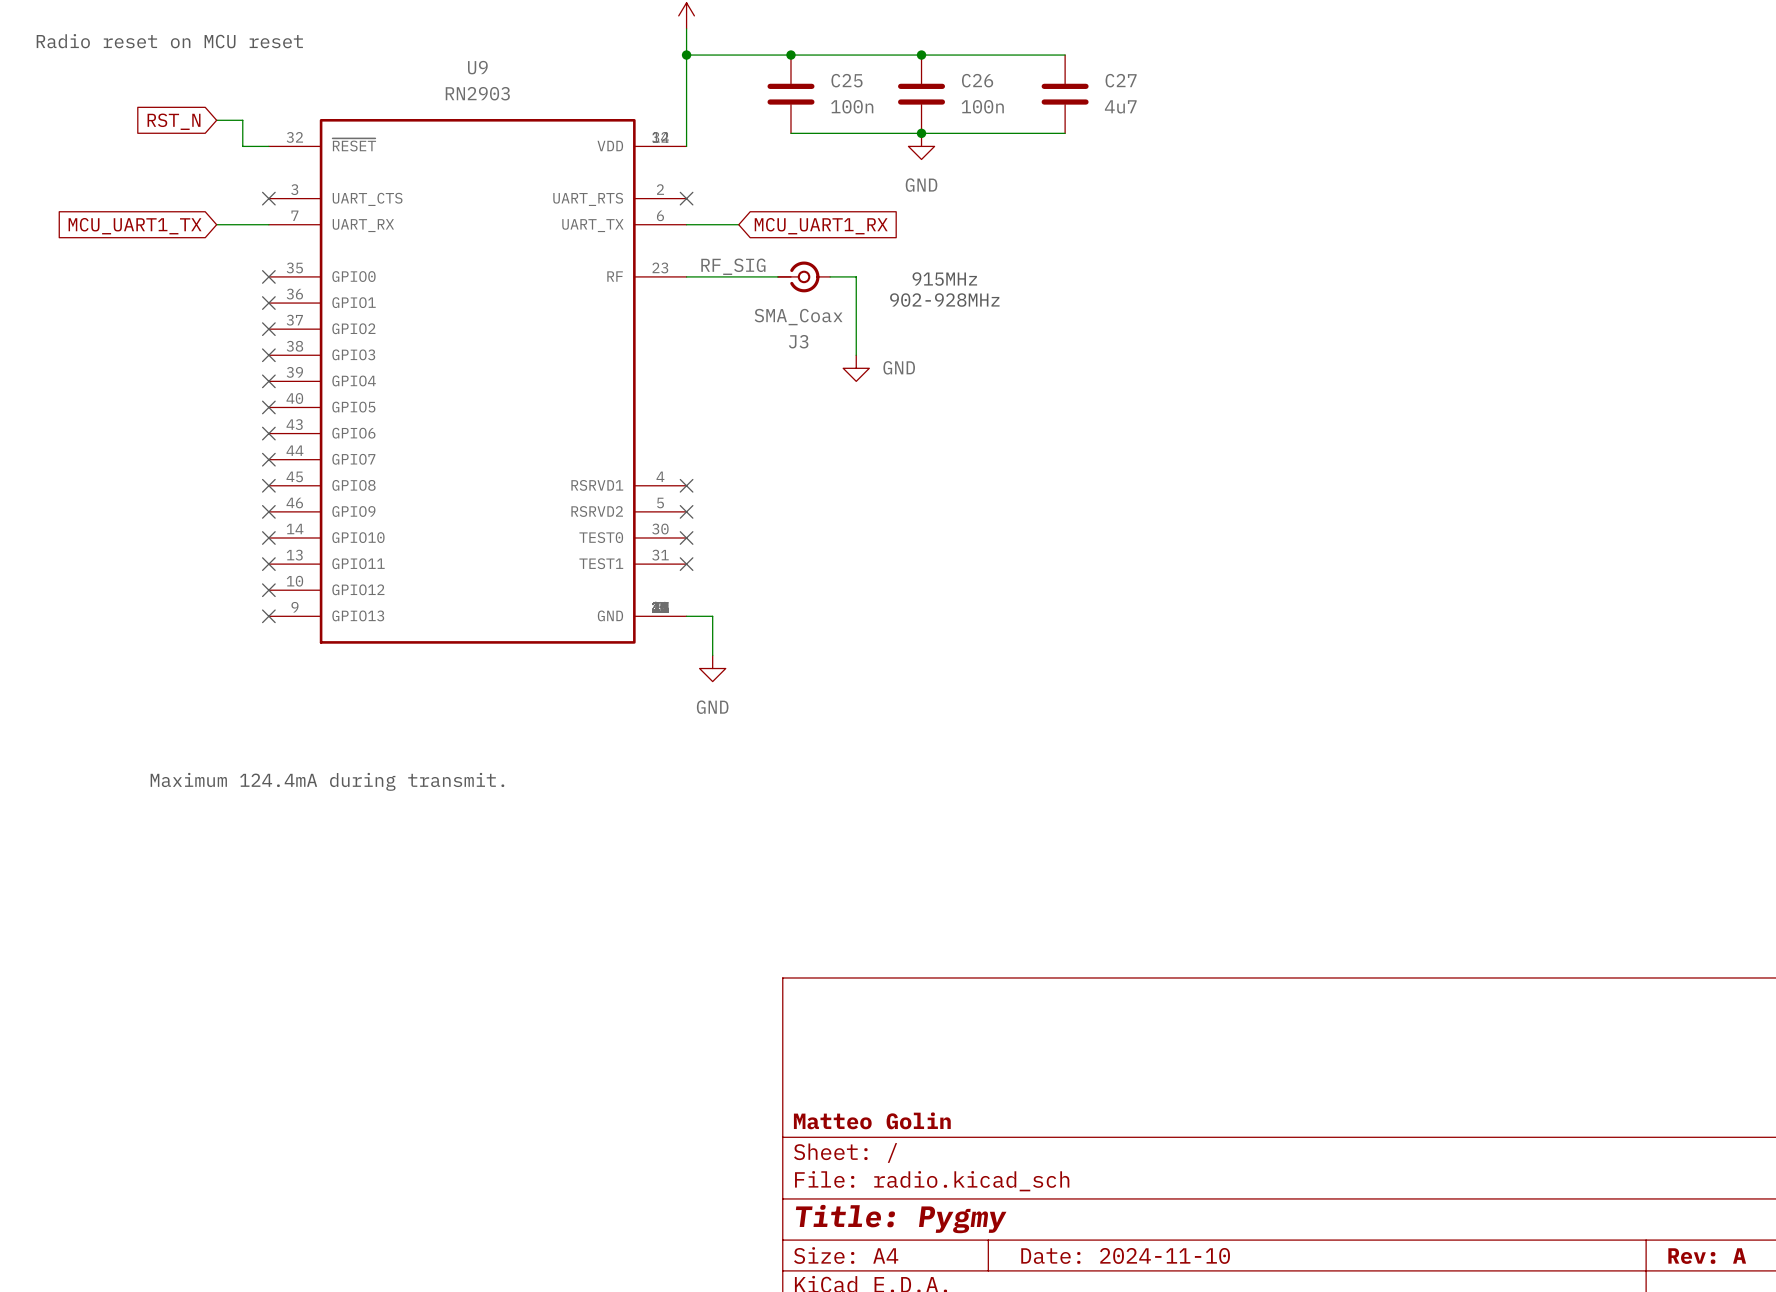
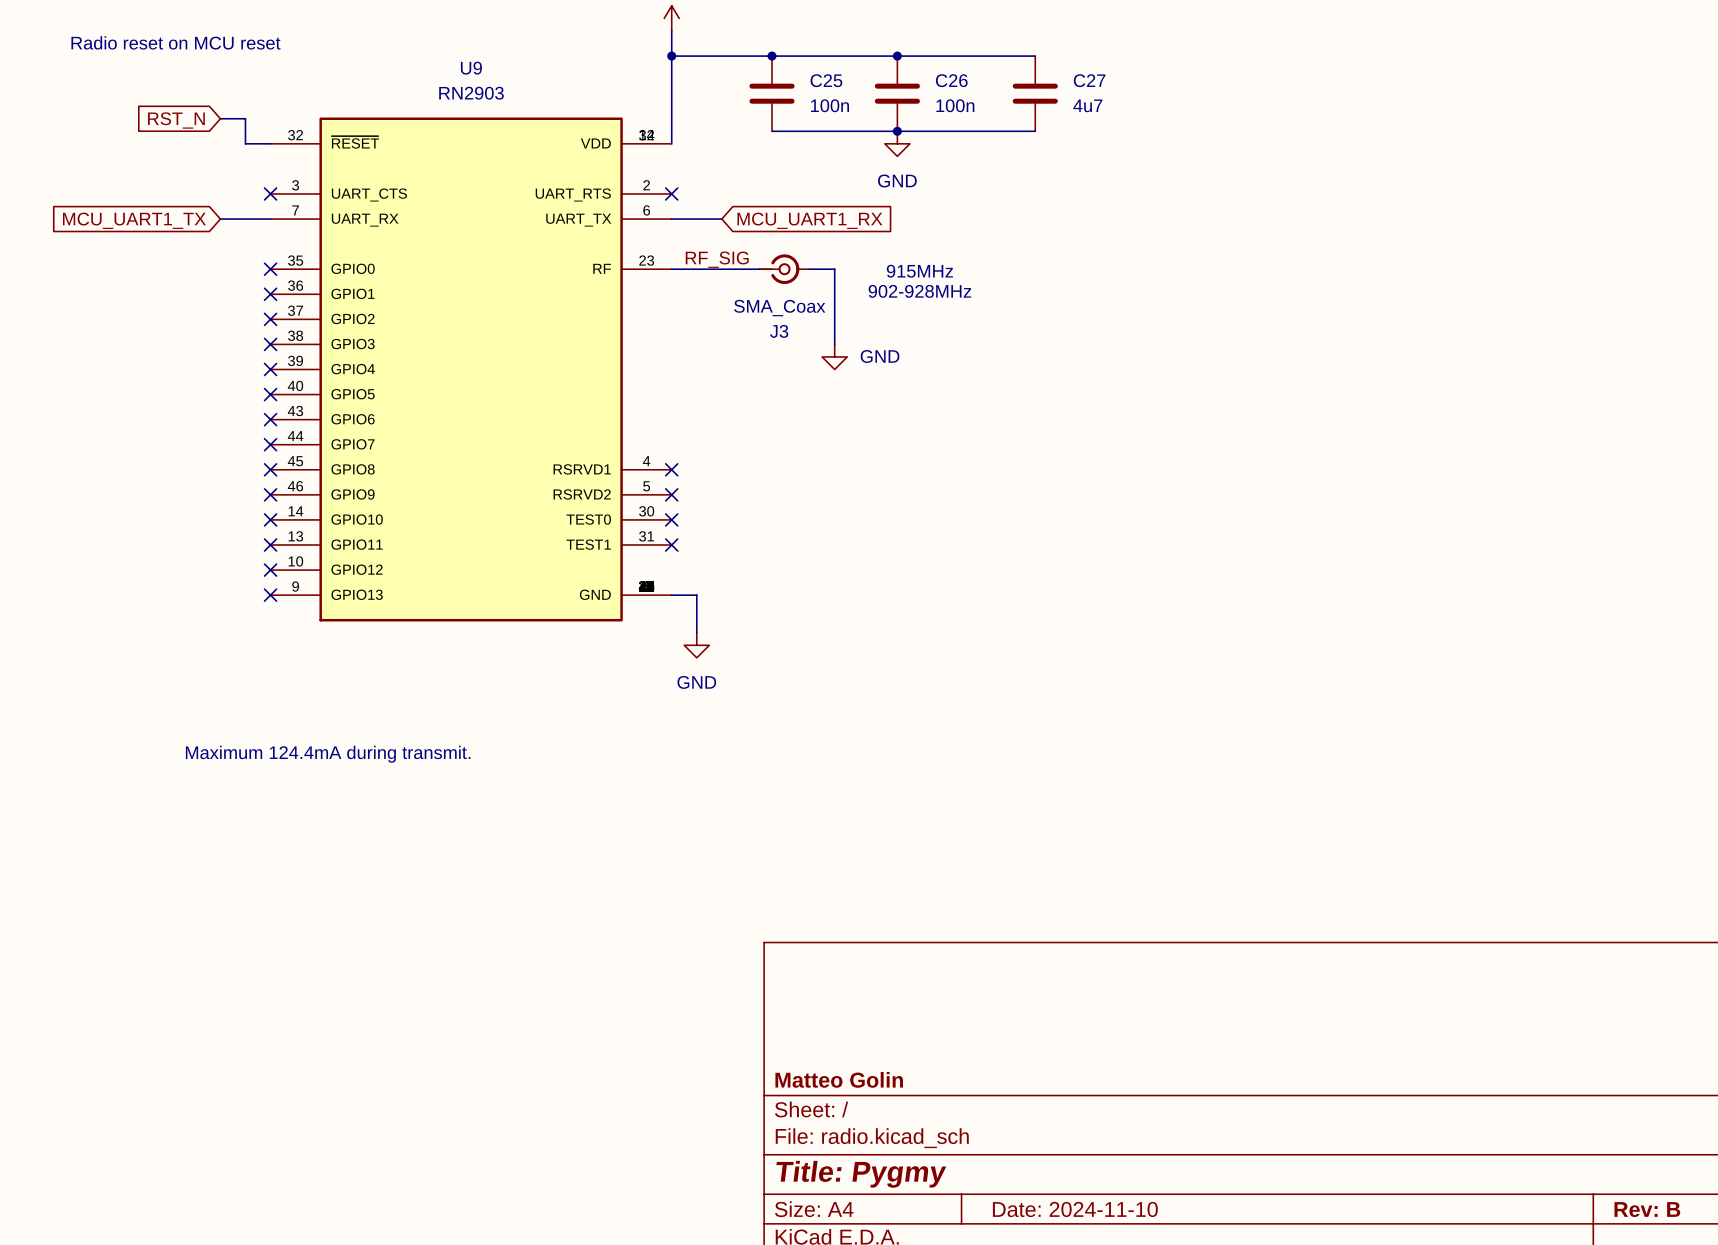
title block: Rev: A (1707, 1256) -> Rev: B (1647, 1209)

